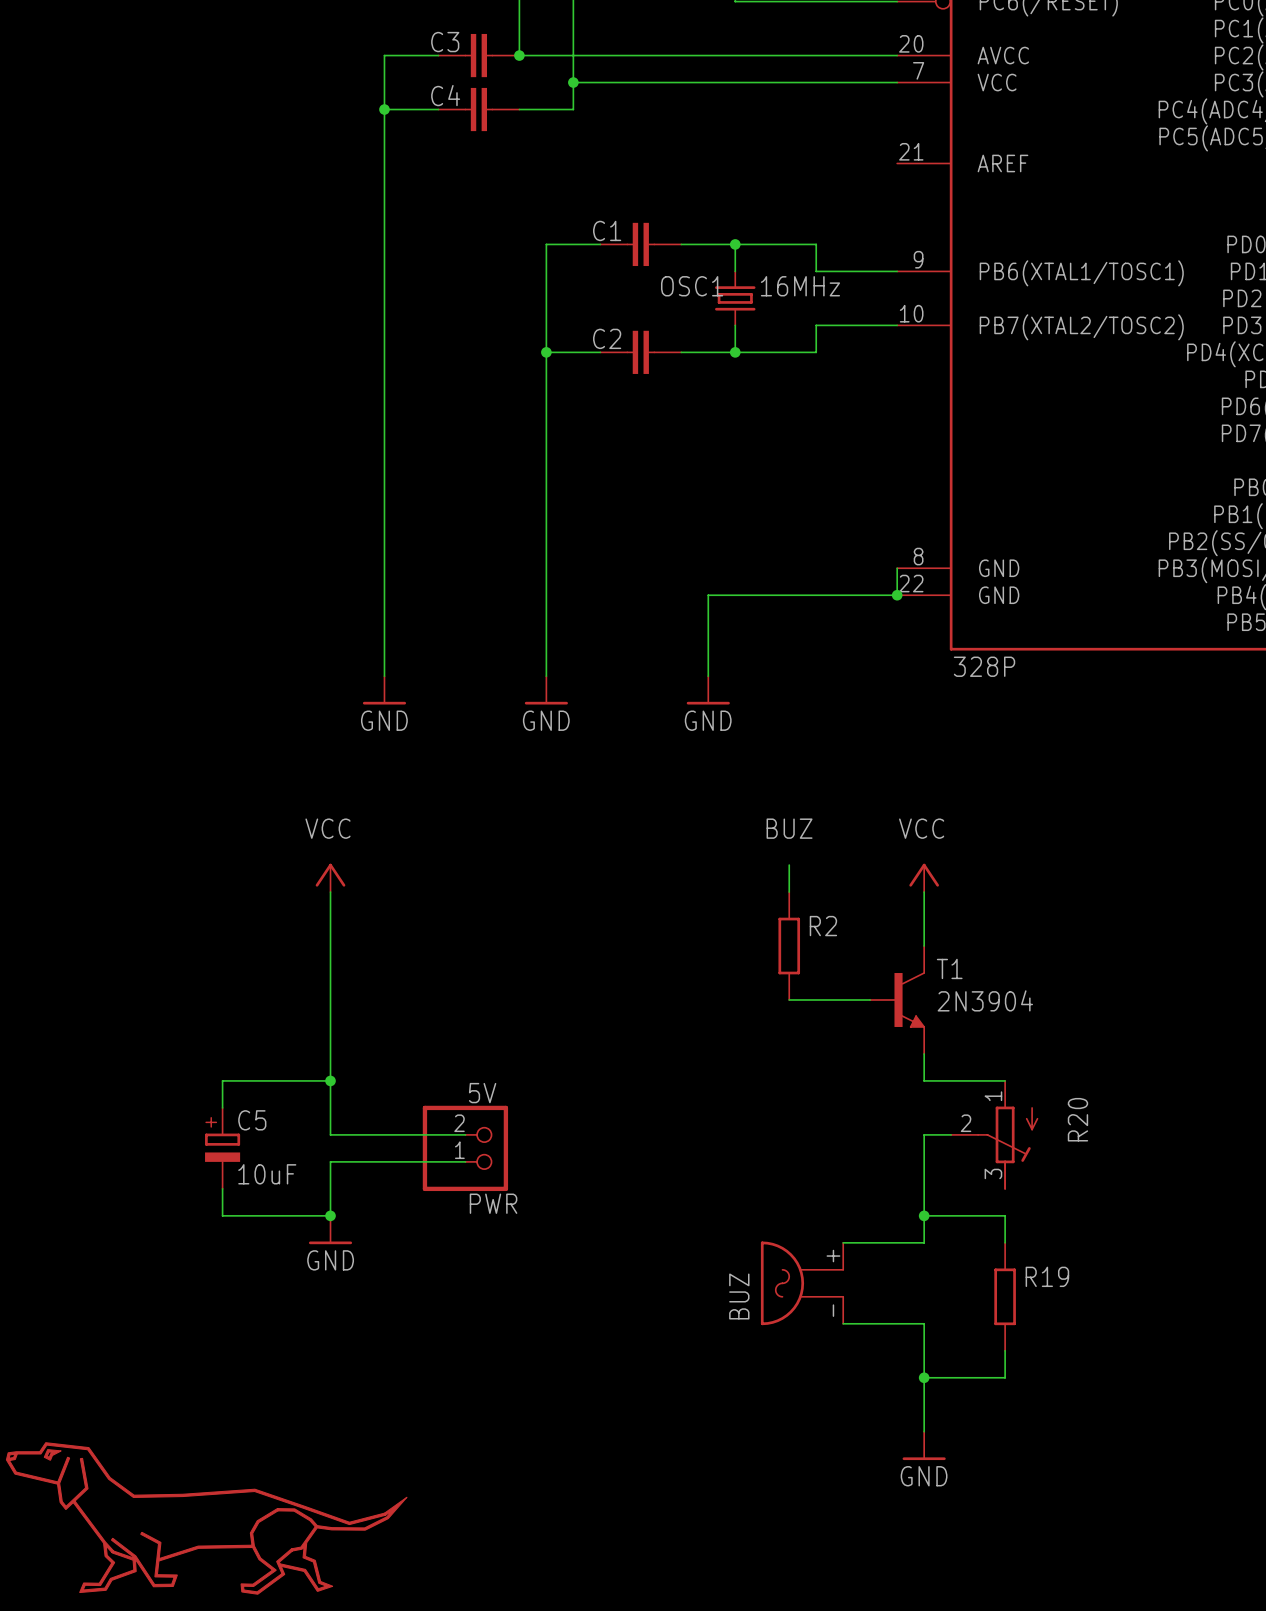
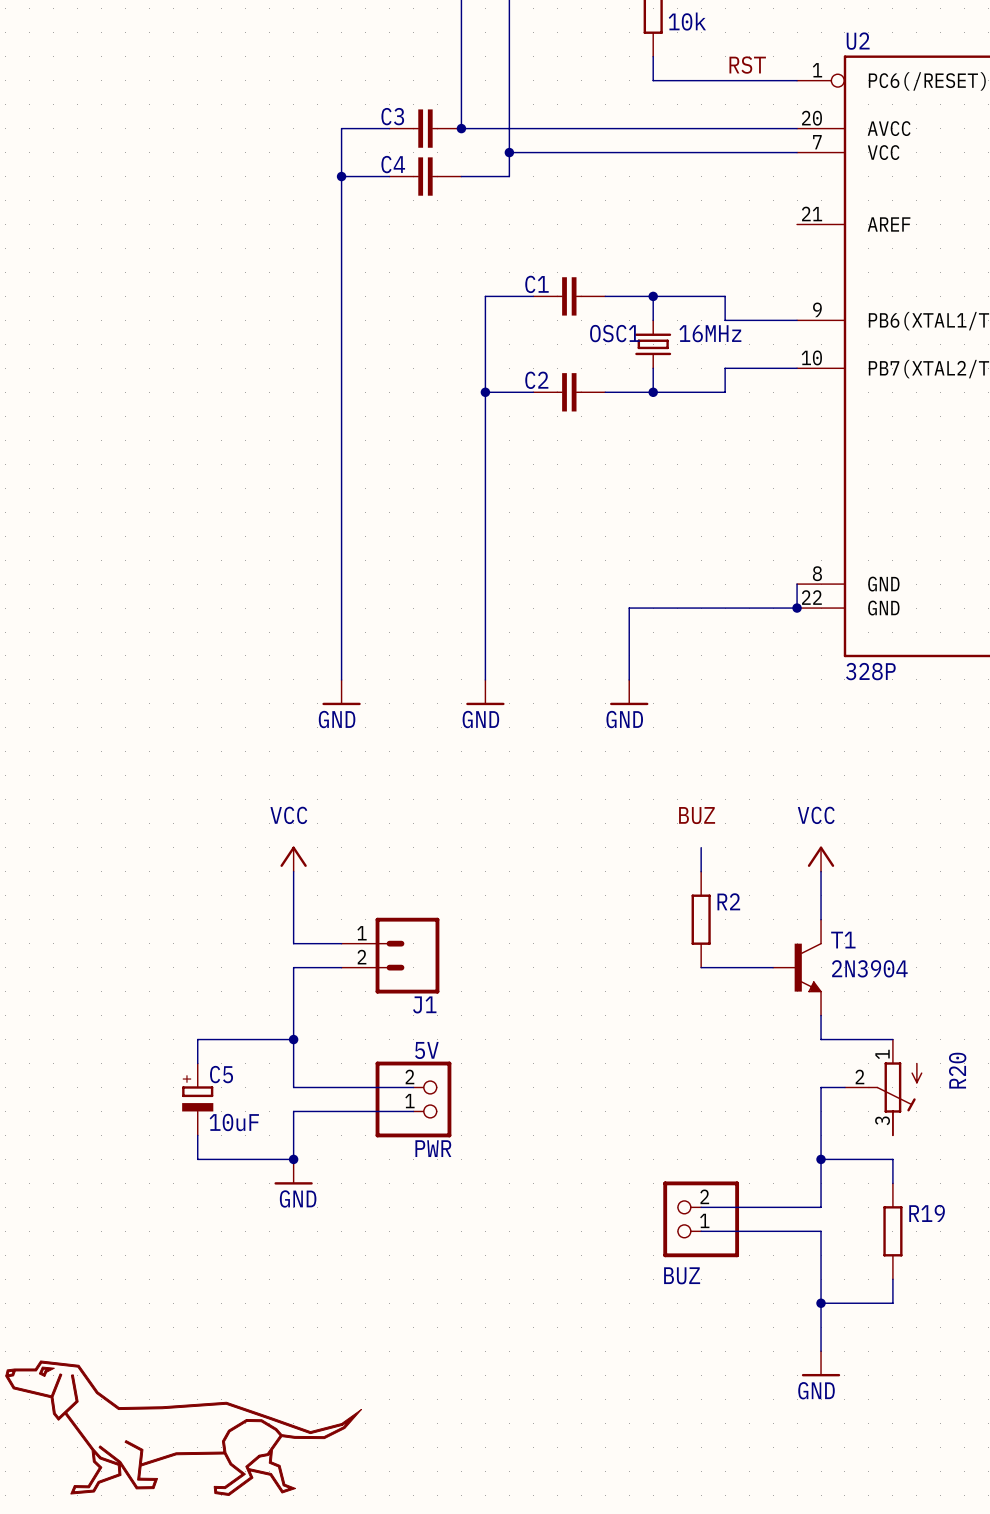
wire: (330, 973) (330, 999) -> (293, 943) (341, 943)
J1: none -> (390, 955)
wire: none -> (293, 967) (341, 967)
wire: (843, 1242) (924, 1242) -> (701, 1207) (821, 1207) (821, 1183)
BUZ: none -> (701, 1219)
BUZ: (802, 1283) -> none
wire: (843, 1323) (924, 1323) -> (701, 1231) (821, 1231) (821, 1255)

